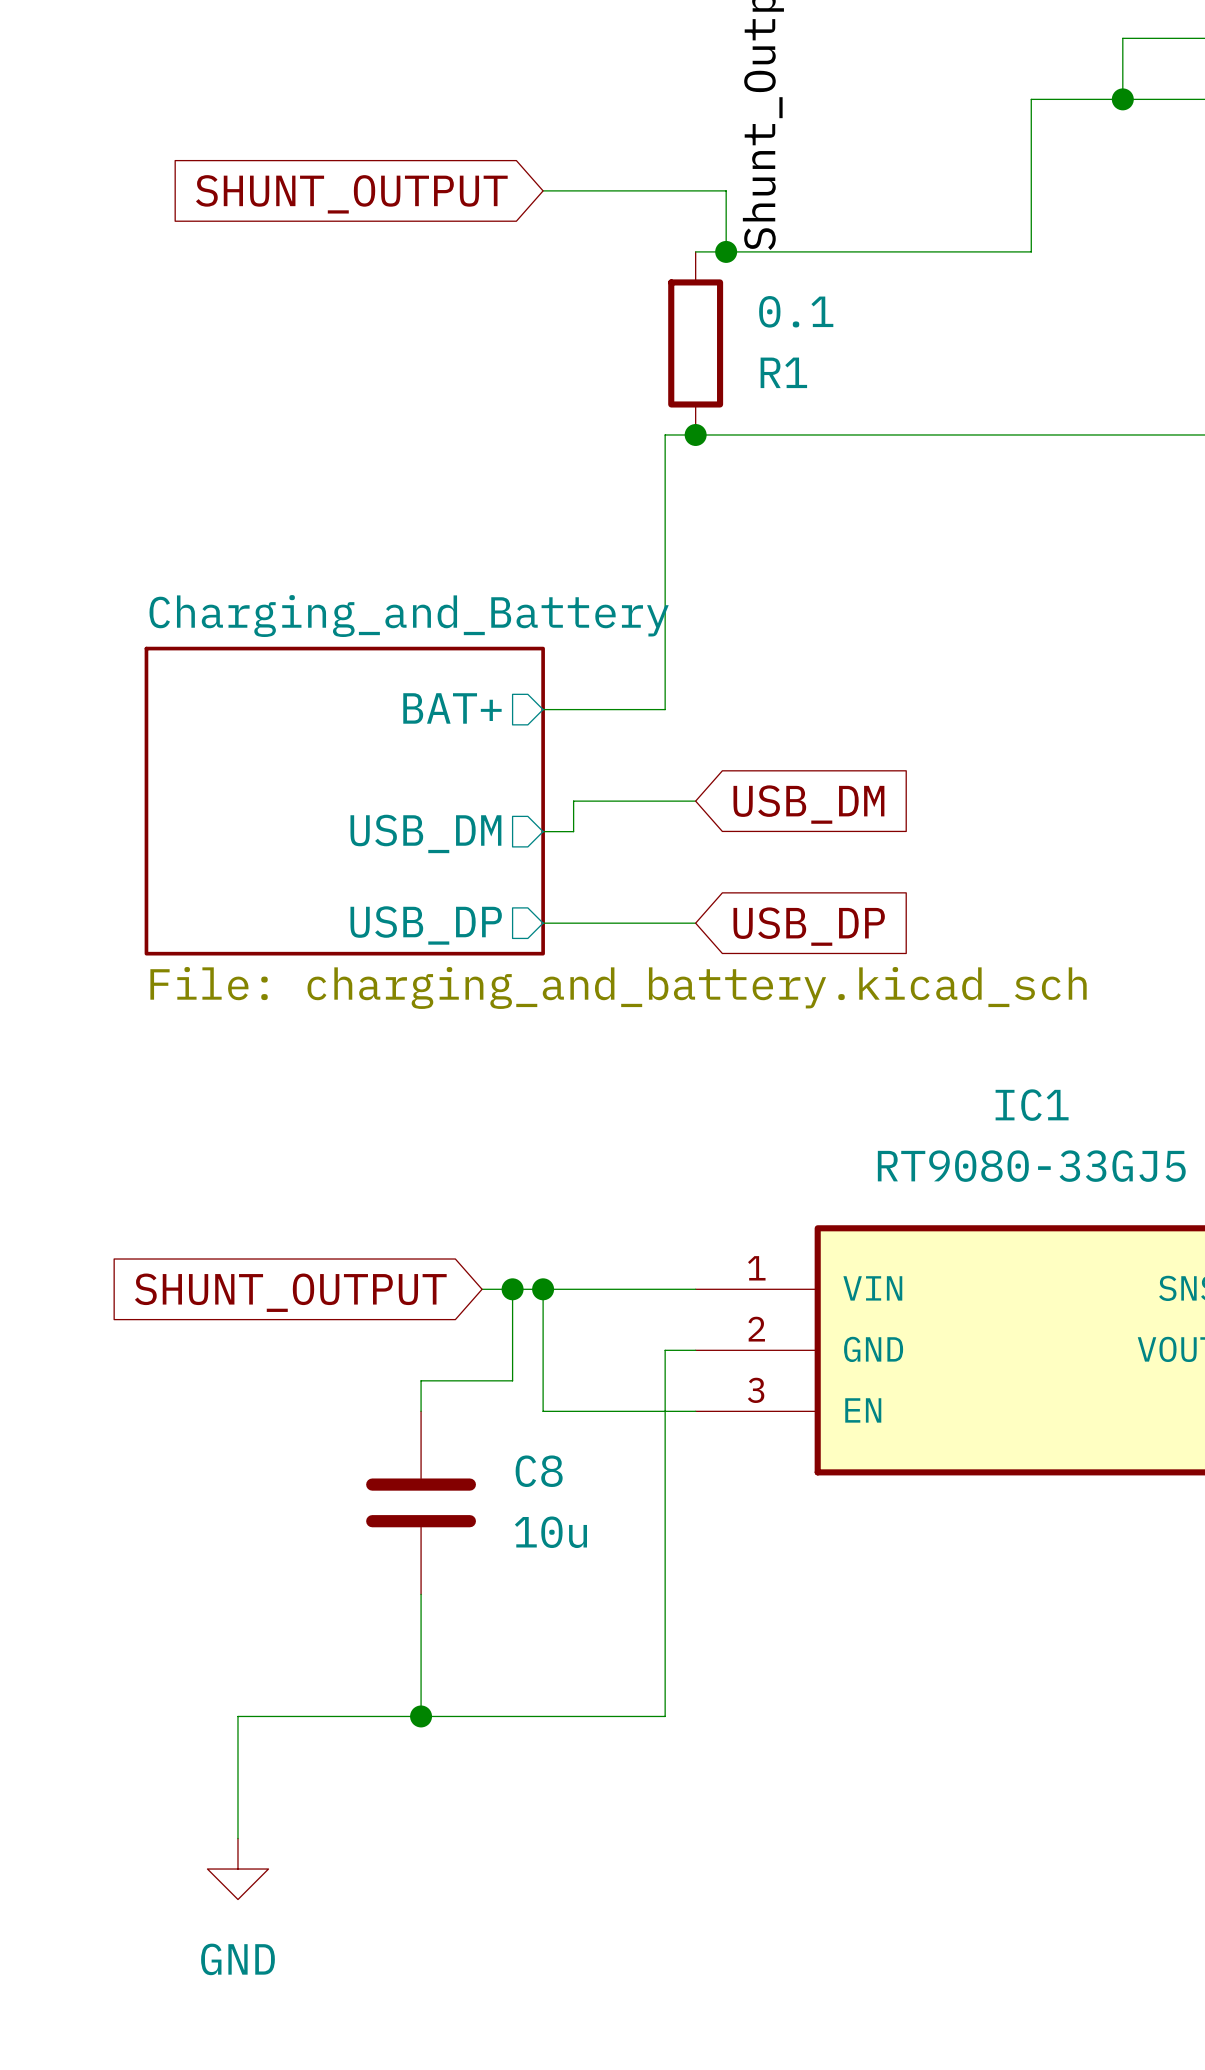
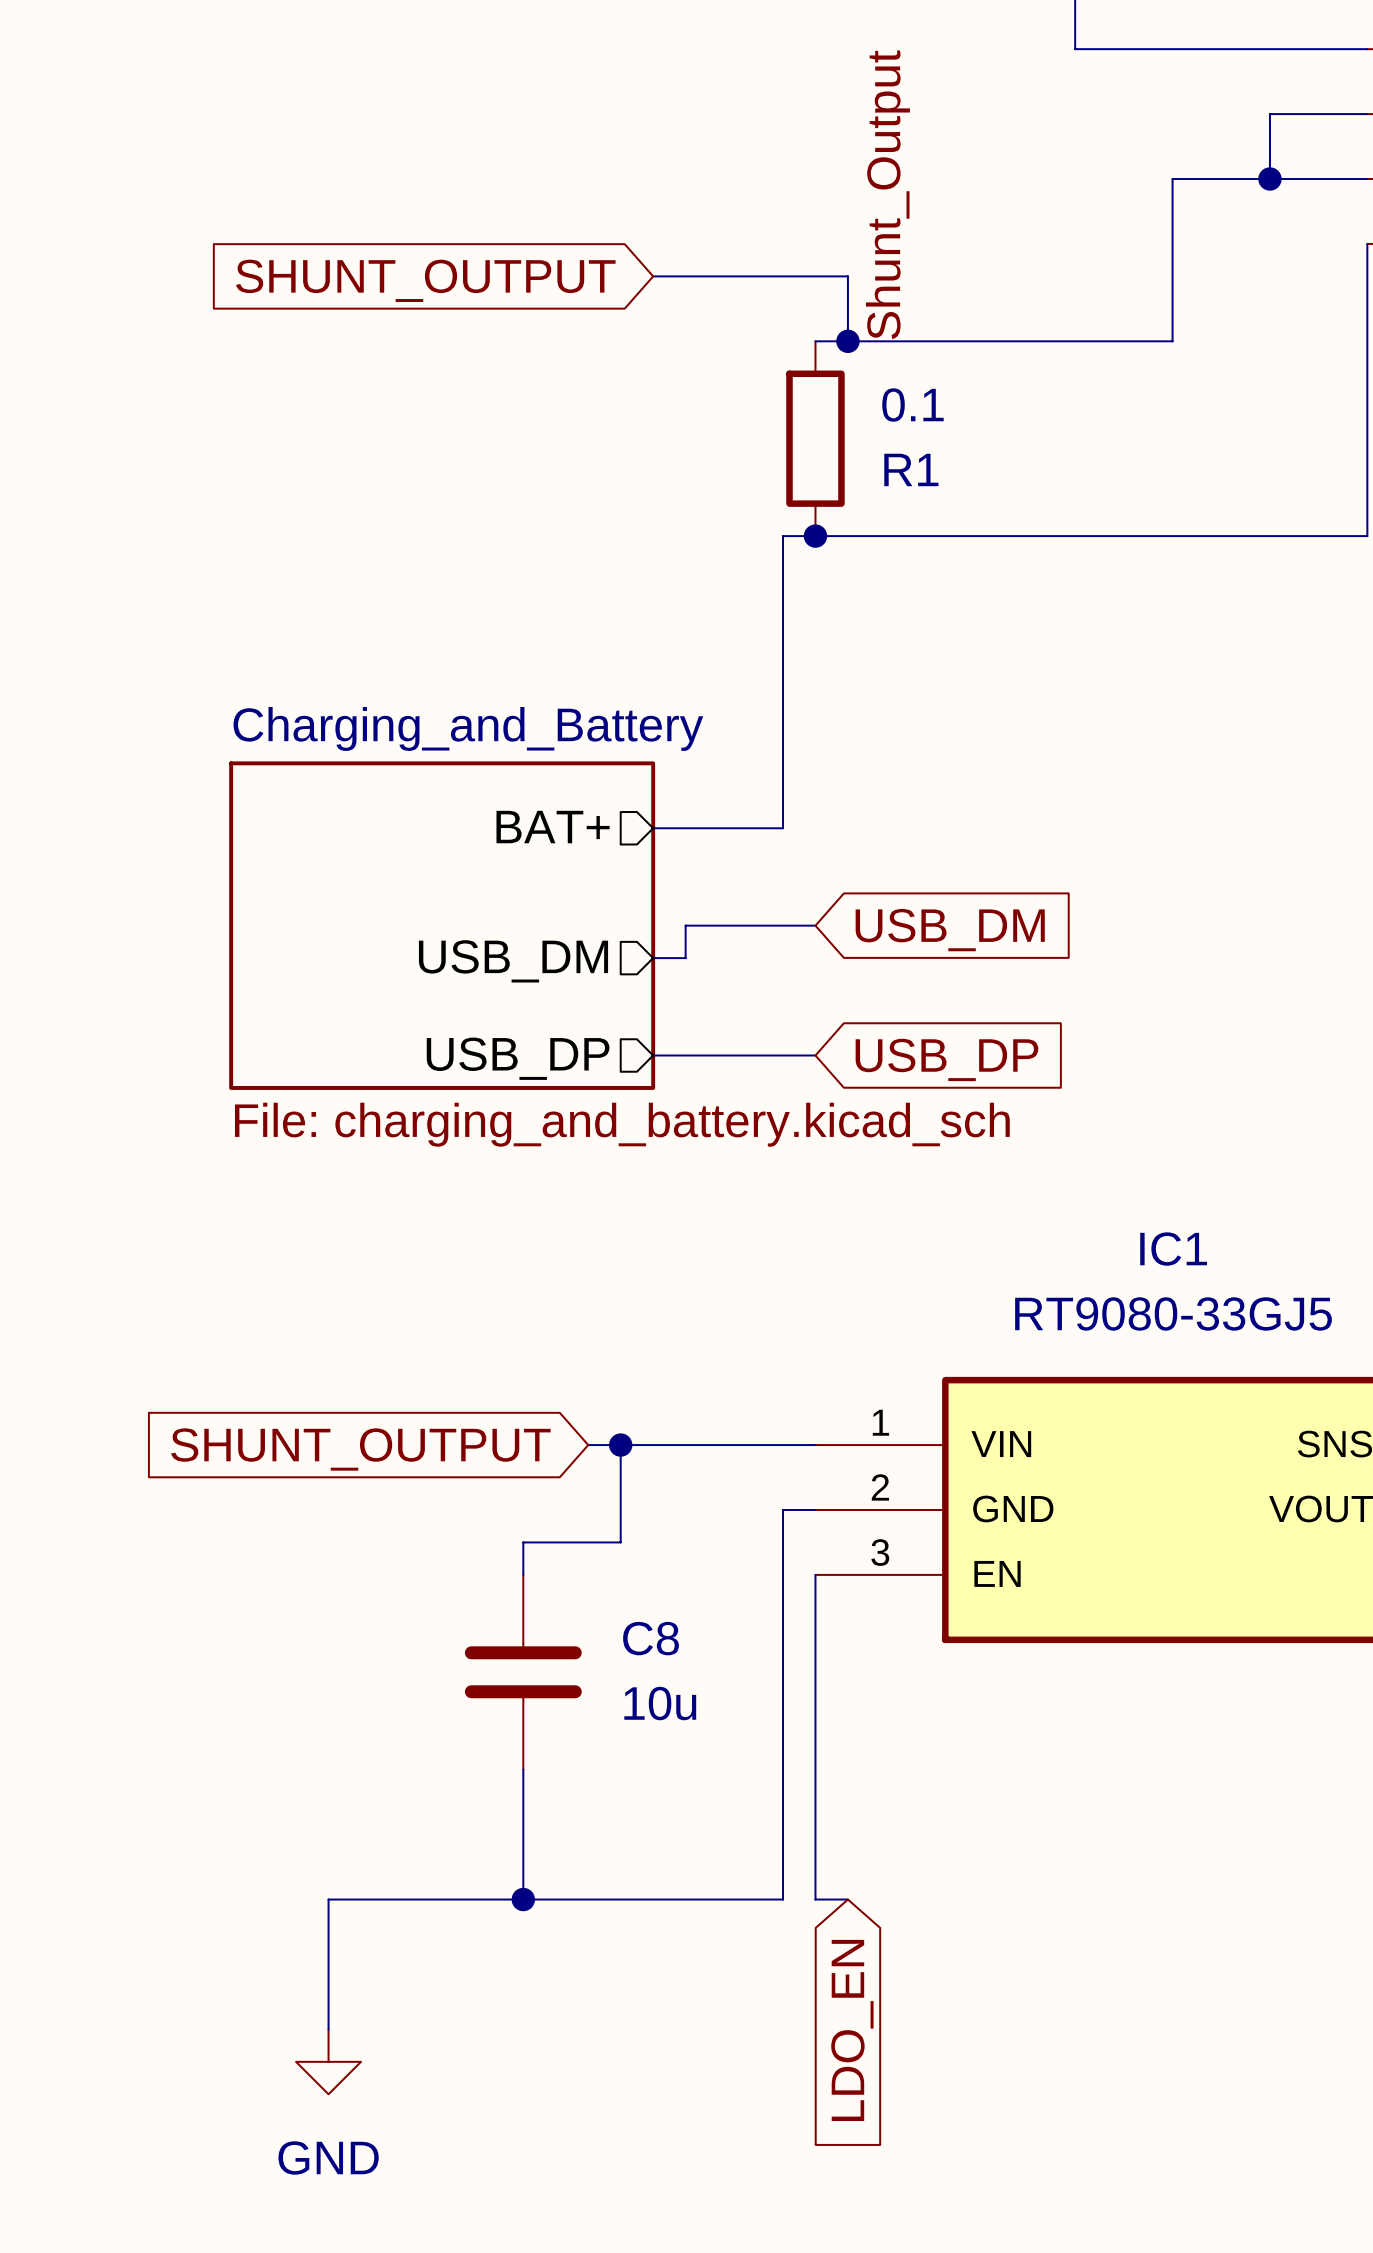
wire: (543, 1289) (543, 1411) (695, 1411) -> (847, 1899) (815, 1899) (815, 1574)
junction: (543, 1289) -> none
global label: none -> LDO_EN (852, 2030)

